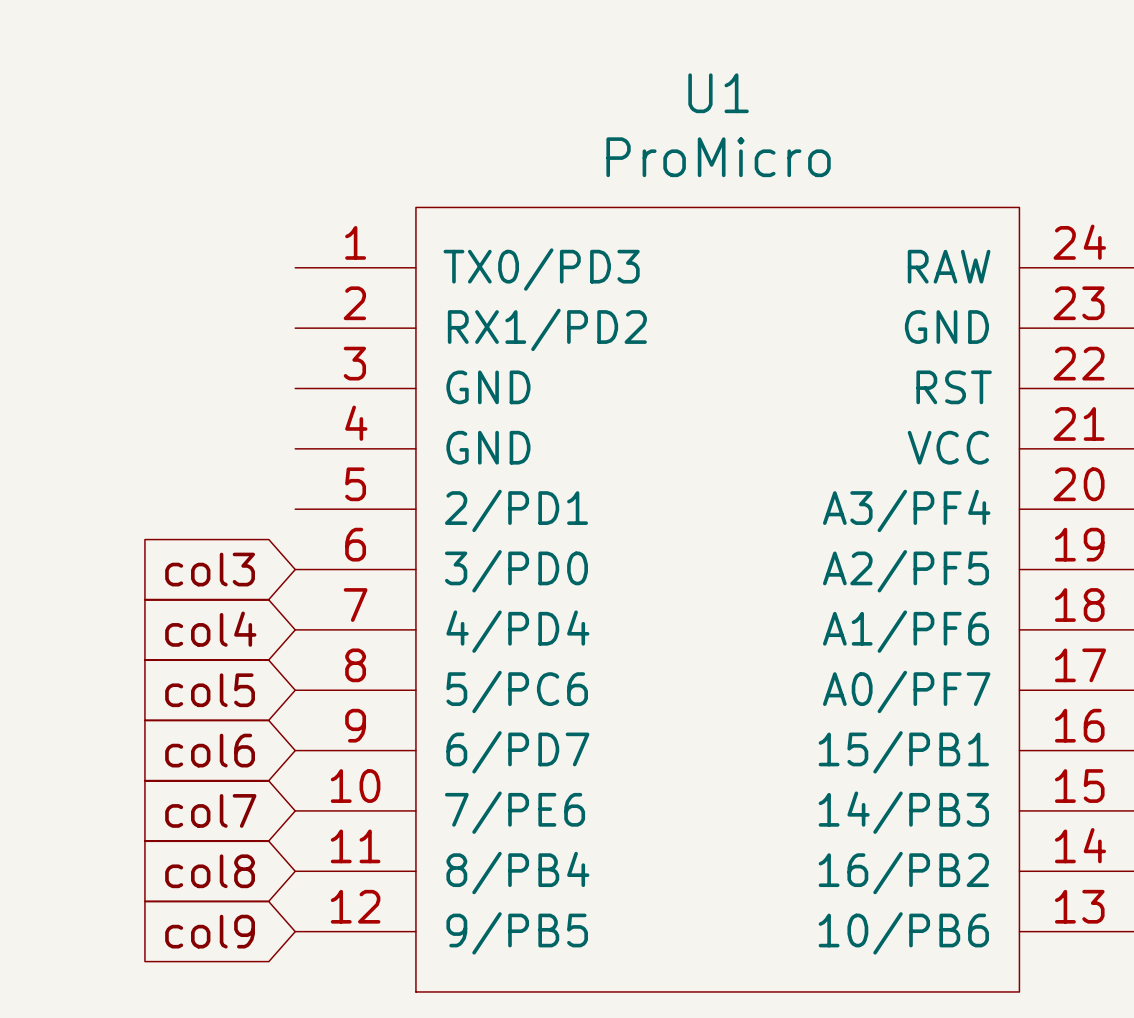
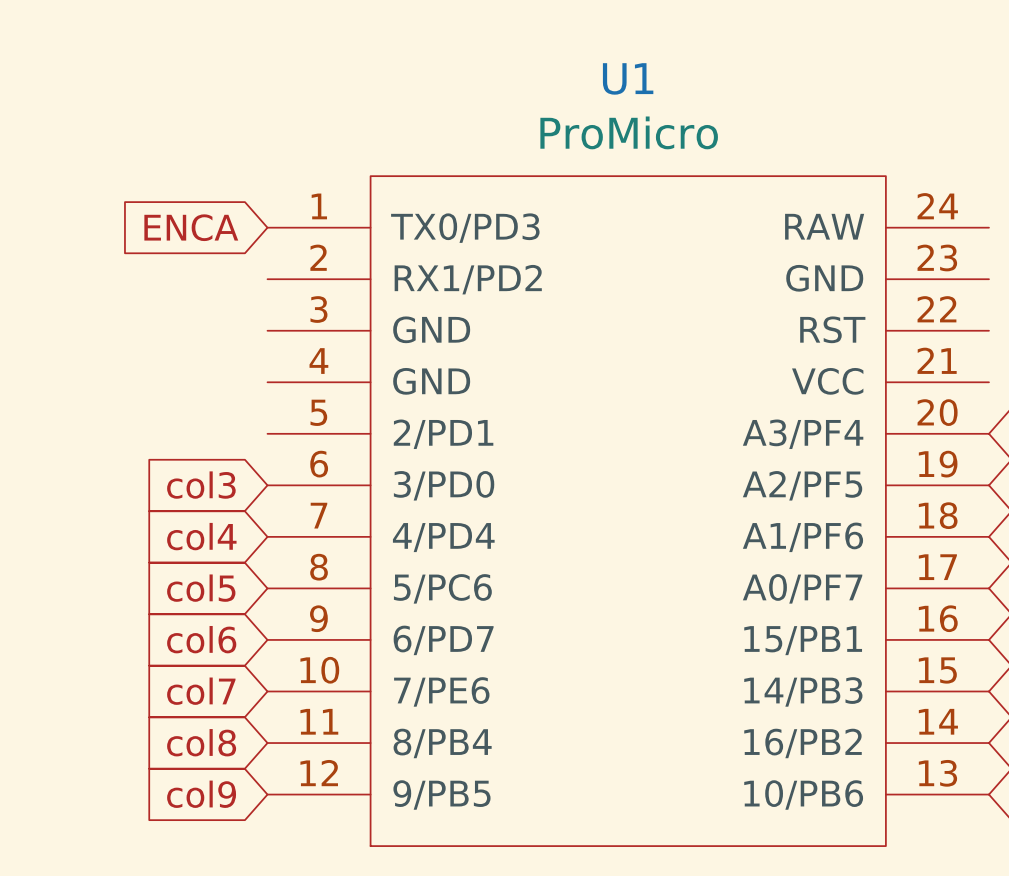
global label: none -> ENCA (191, 227)

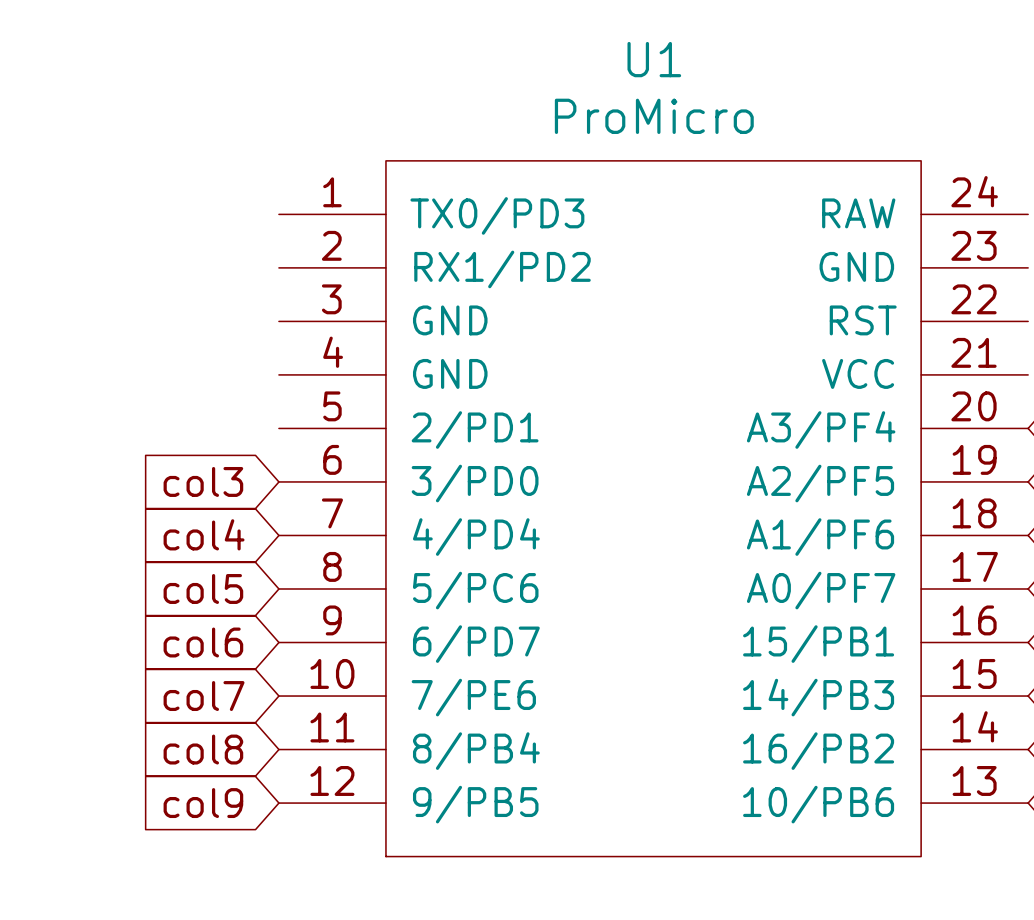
global label: ENCA (191, 227) -> none

